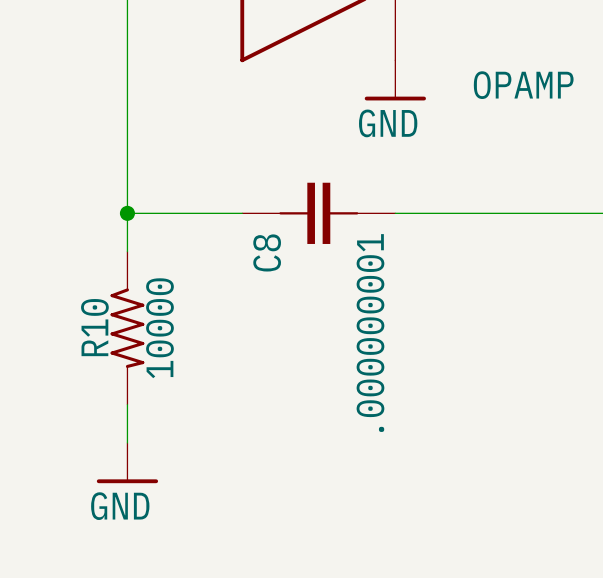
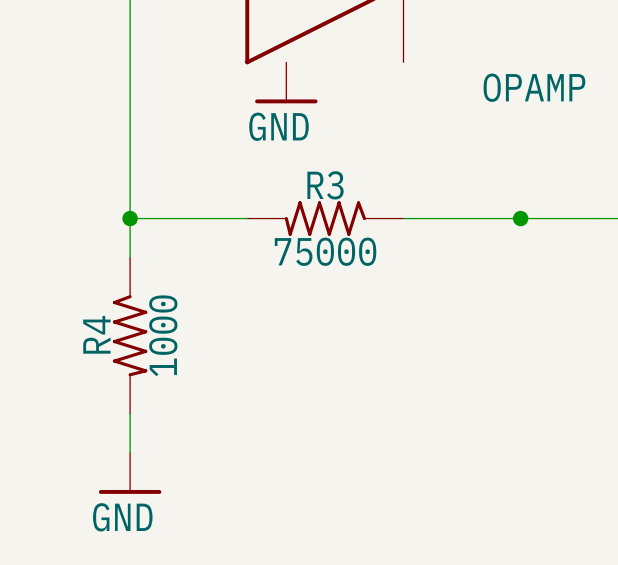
power symbol position: GND (395, 80) -> GND (286, 82)
C8: .000000001 (318, 213) -> none
R3: none -> 75000 (325, 218)
junction: none -> (520, 218)
R10 name: R10 (94, 327) -> R4 (96, 334)
R10 value: 10000 (159, 328) -> 1000 (163, 335)

